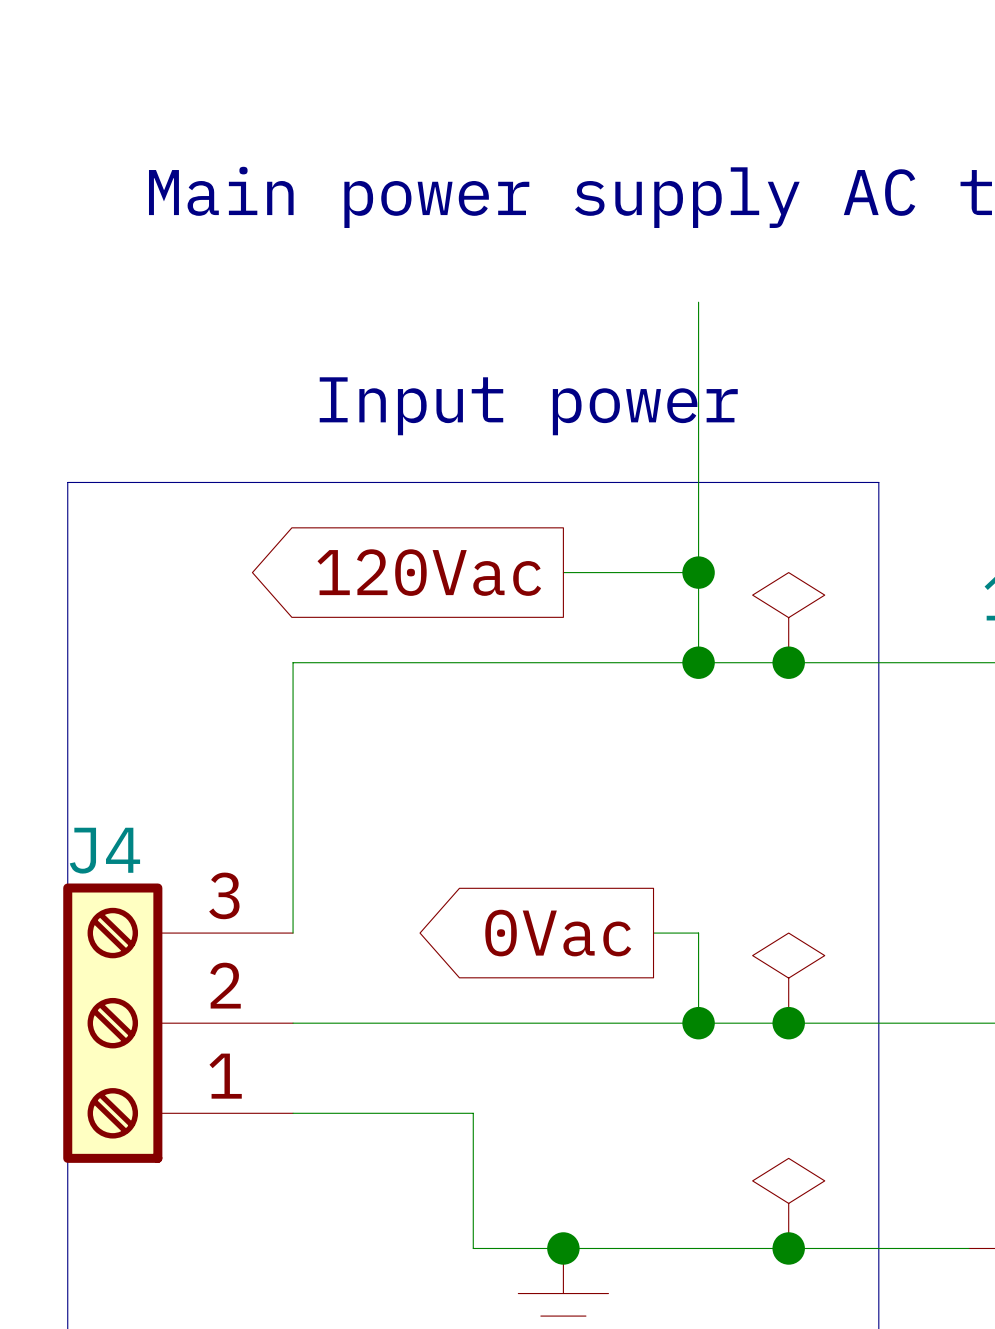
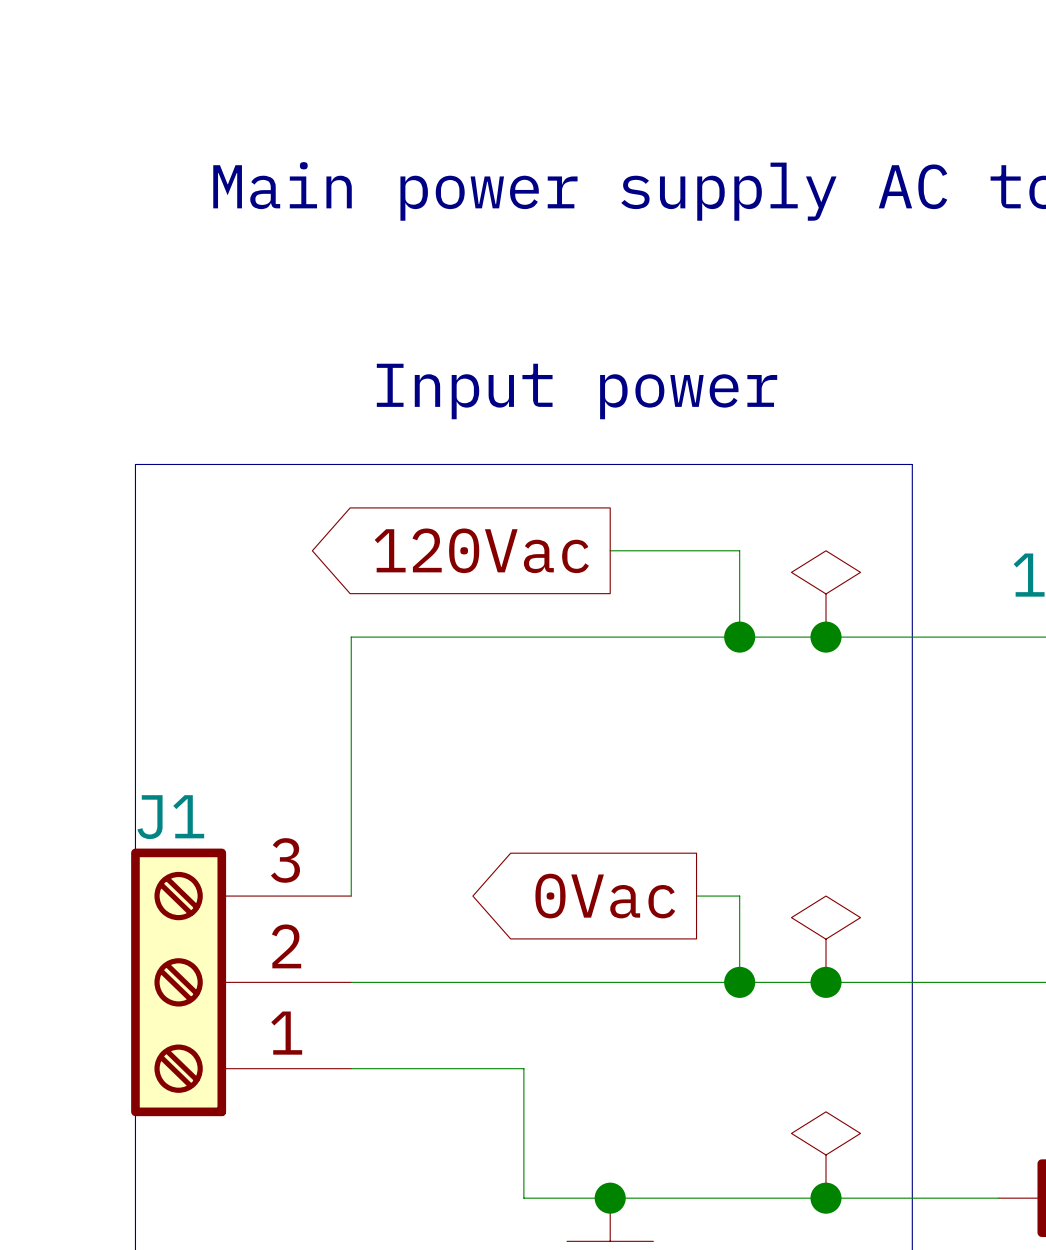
wire: (698, 302) (698, 572) -> none
junction: (698, 572) -> none
J4 name: J4 (104, 850) -> J1 (170, 817)

